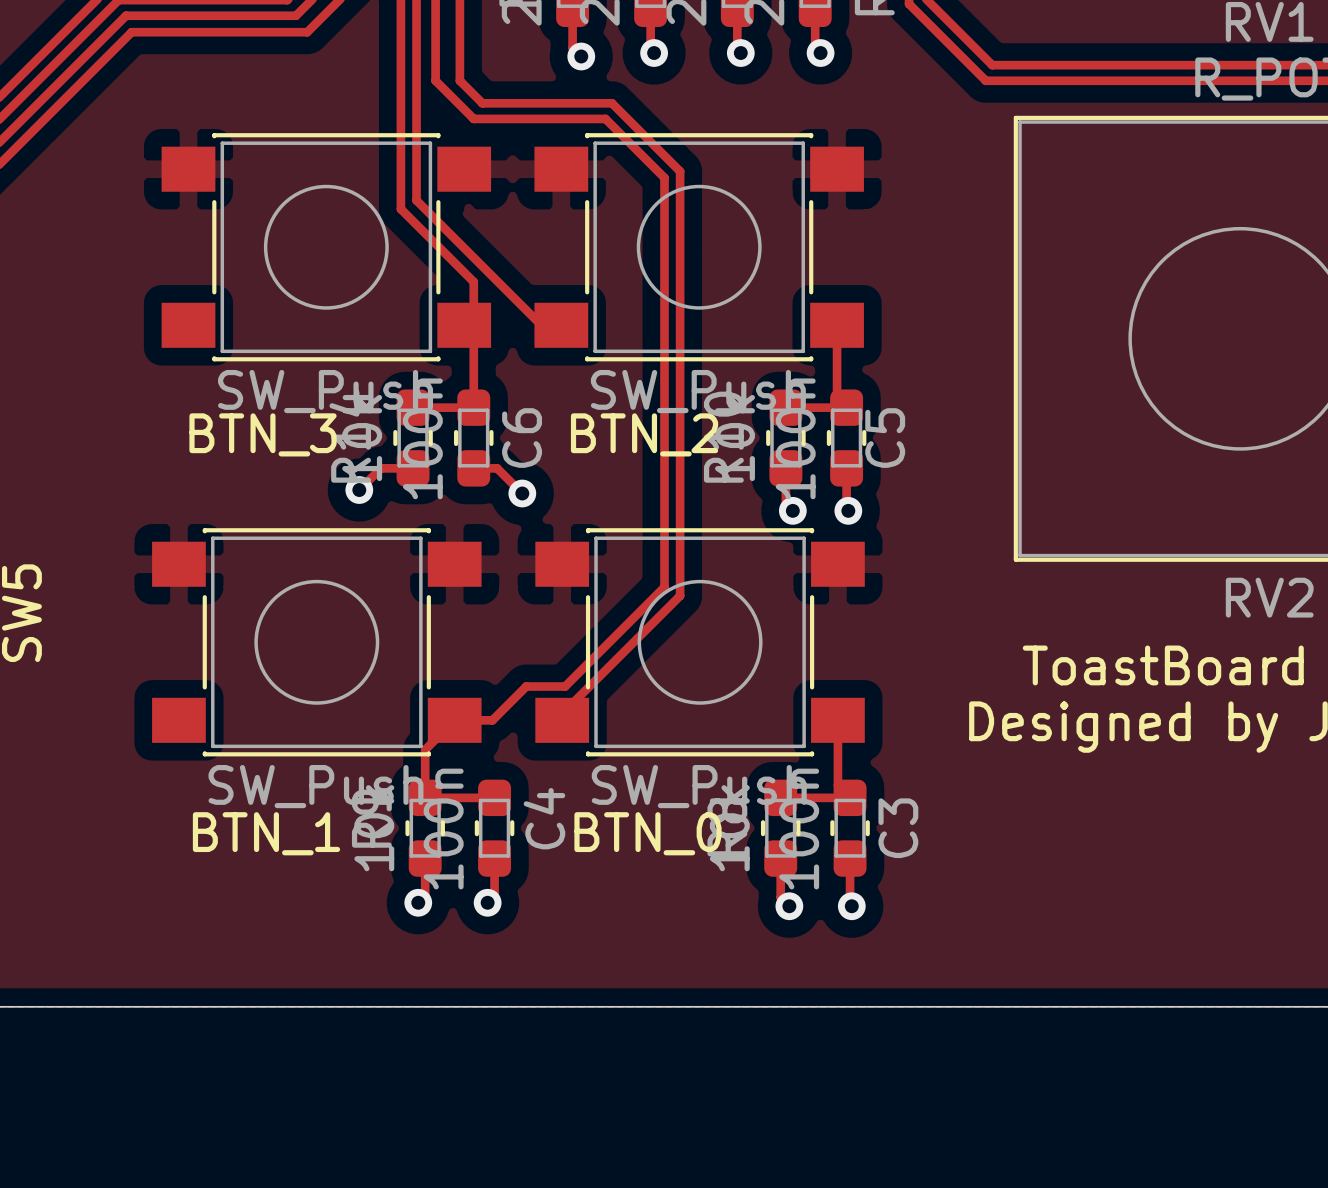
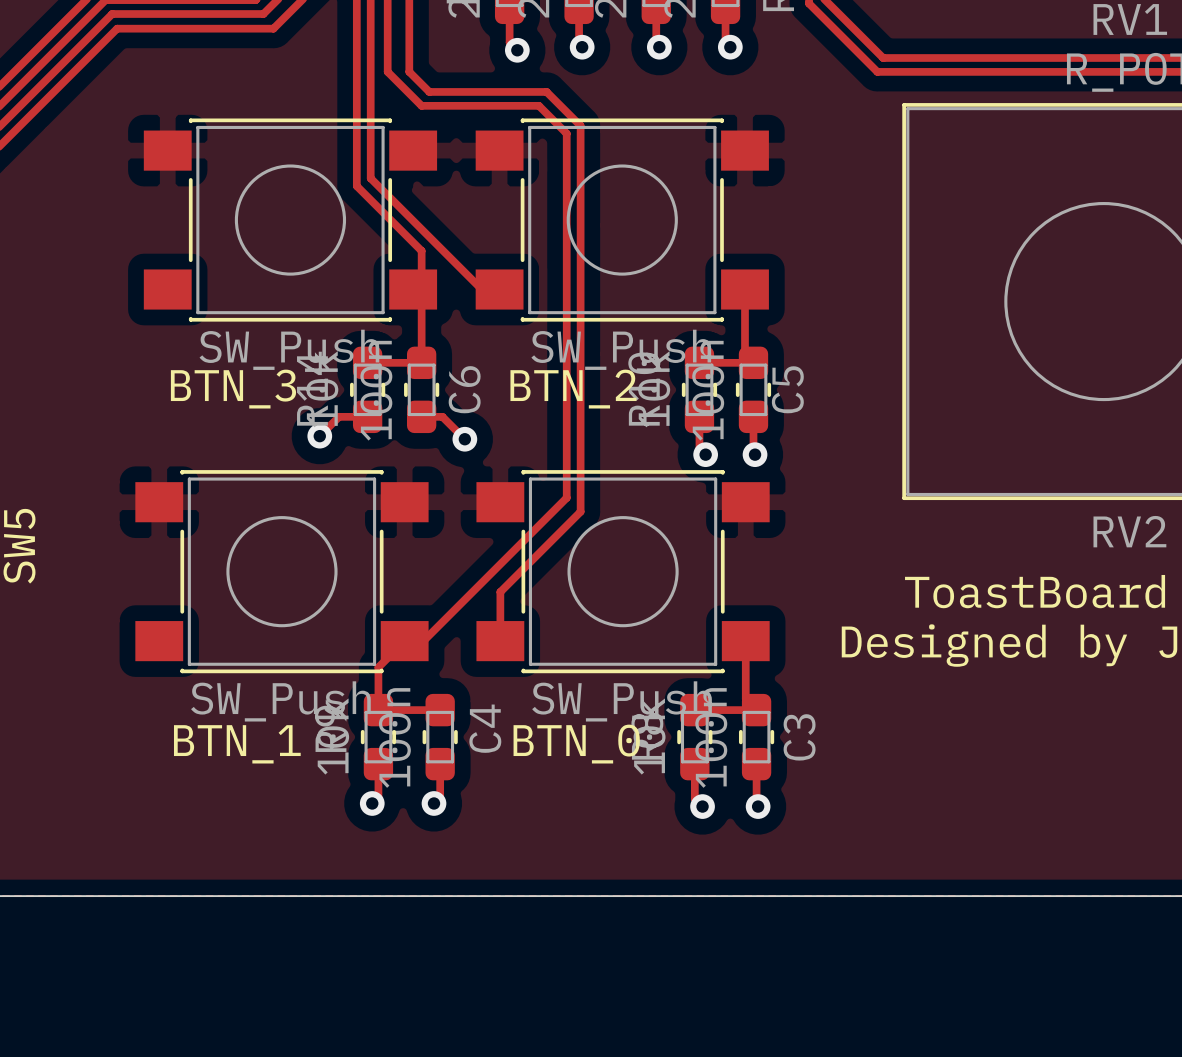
track: (612, 103) (680, 171) (680, 595) (562, 713) -> (544, 91) (580, 125) (580, 511) (500, 592) (500, 635)
track: (636, 150) (664, 177) (664, 587) (565, 686) (526, 686) (492, 720) (475, 720) -> (566, 133) (566, 497) (423, 641)

